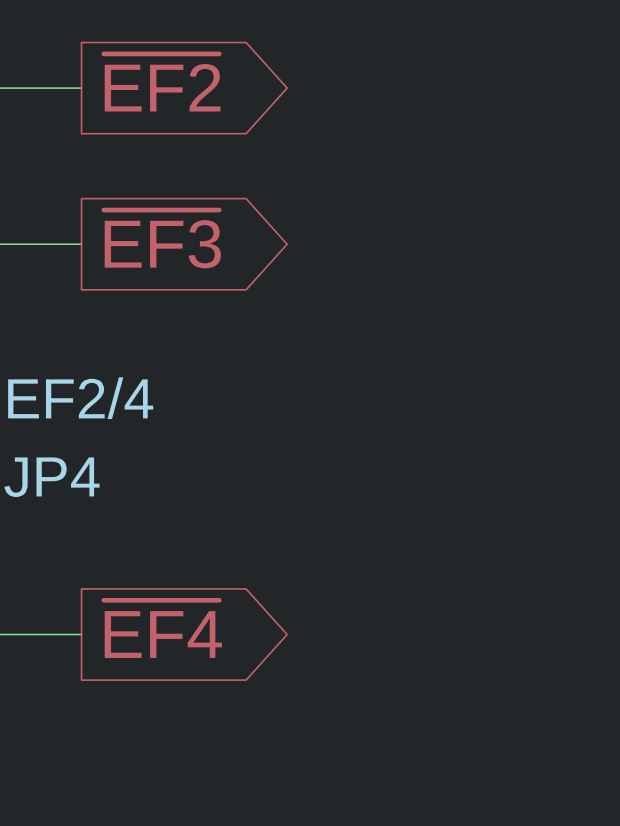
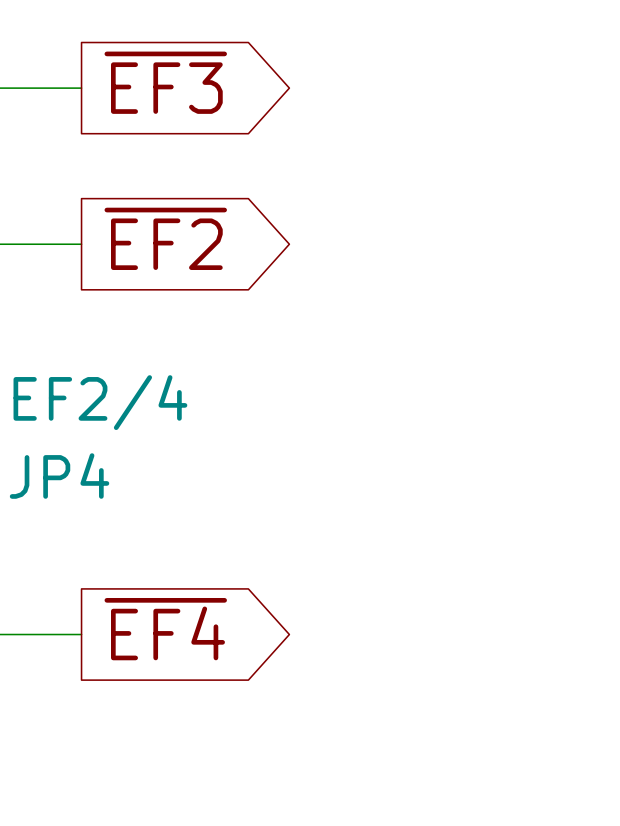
global label: ~{EF2} (162, 82) -> ~{EF3} (165, 82)
global label: ~{EF3} (162, 239) -> ~{EF2} (165, 238)

